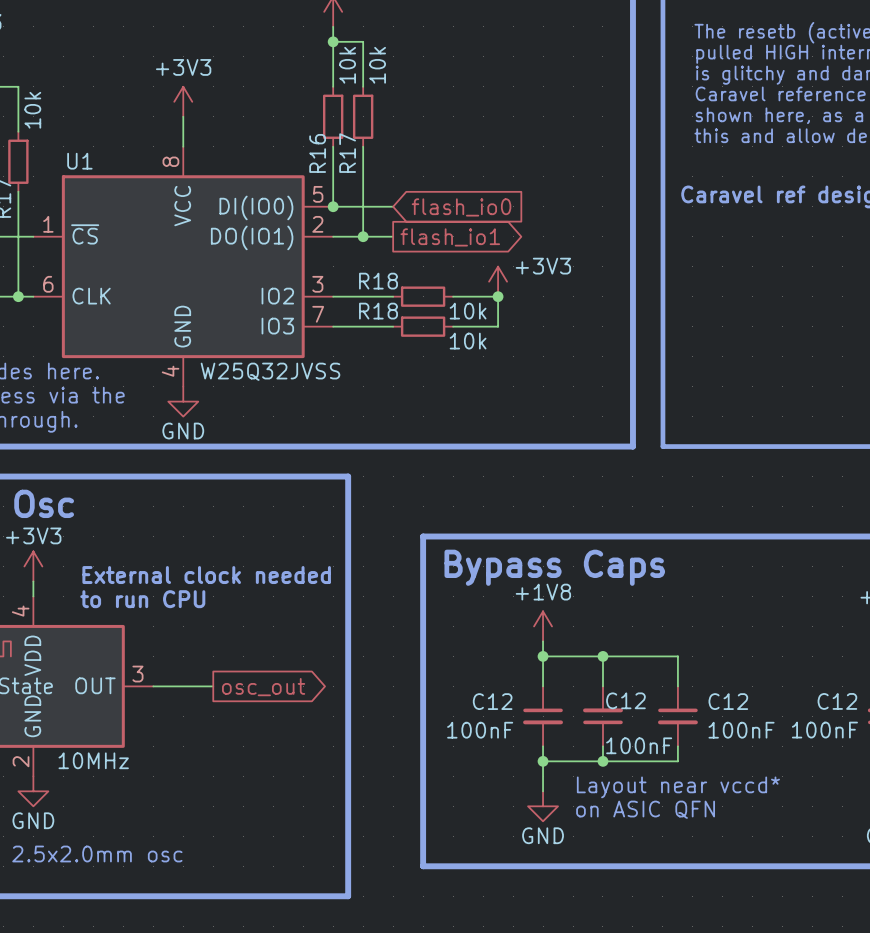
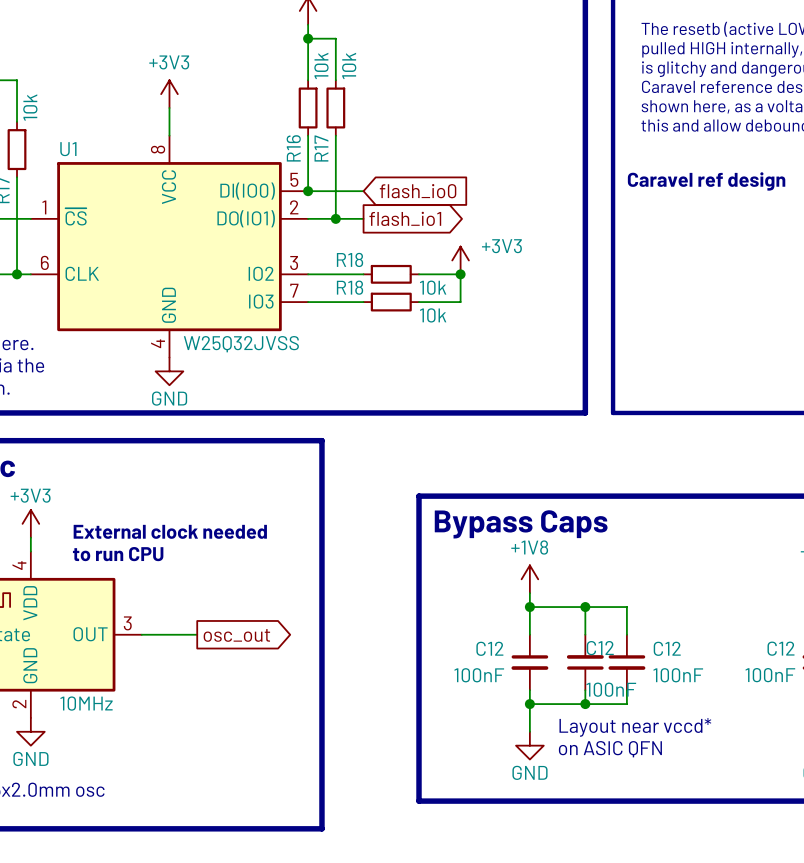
line: (453, 536) (423, 536) (423, 866) (453, 866) -> (419, 496) (419, 801)
text position: Bypass Caps (554, 567) -> Bypass Caps (521, 524)
power symbol position: +1V8 (543, 626) -> +1V8 (529, 579)
wire: (543, 641) (543, 686) -> (529, 593) (529, 634)
wire: (543, 656) (573, 656) -> none
junction: (543, 656) -> none
junction: none -> (529, 607)
wire: (602, 656) (602, 686) -> (585, 607) (585, 634)
junction: (602, 656) -> none
junction: none -> (585, 607)
C12: 100nF (543, 716) -> none
C12: none -> 100nF (529, 662)
C12: 100nF (602, 716) -> none
C12: none -> 100nF (585, 662)
wire: (543, 746) (543, 791) -> (529, 690) (529, 731)
wire: (602, 746) (602, 761) -> (585, 690) (585, 704)
wire: (543, 761) (573, 761) -> none
junction: (543, 761) -> none
junction: none -> (529, 704)
junction: (602, 761) -> none
junction: none -> (585, 704)
text position: Layout near vccd* (678, 787) -> Layout near vccd* (635, 727)
power symbol position: GND (543, 806) -> GND (529, 745)
text position: on ASIC QFN (645, 809) -> on ASIC QFN (610, 749)

